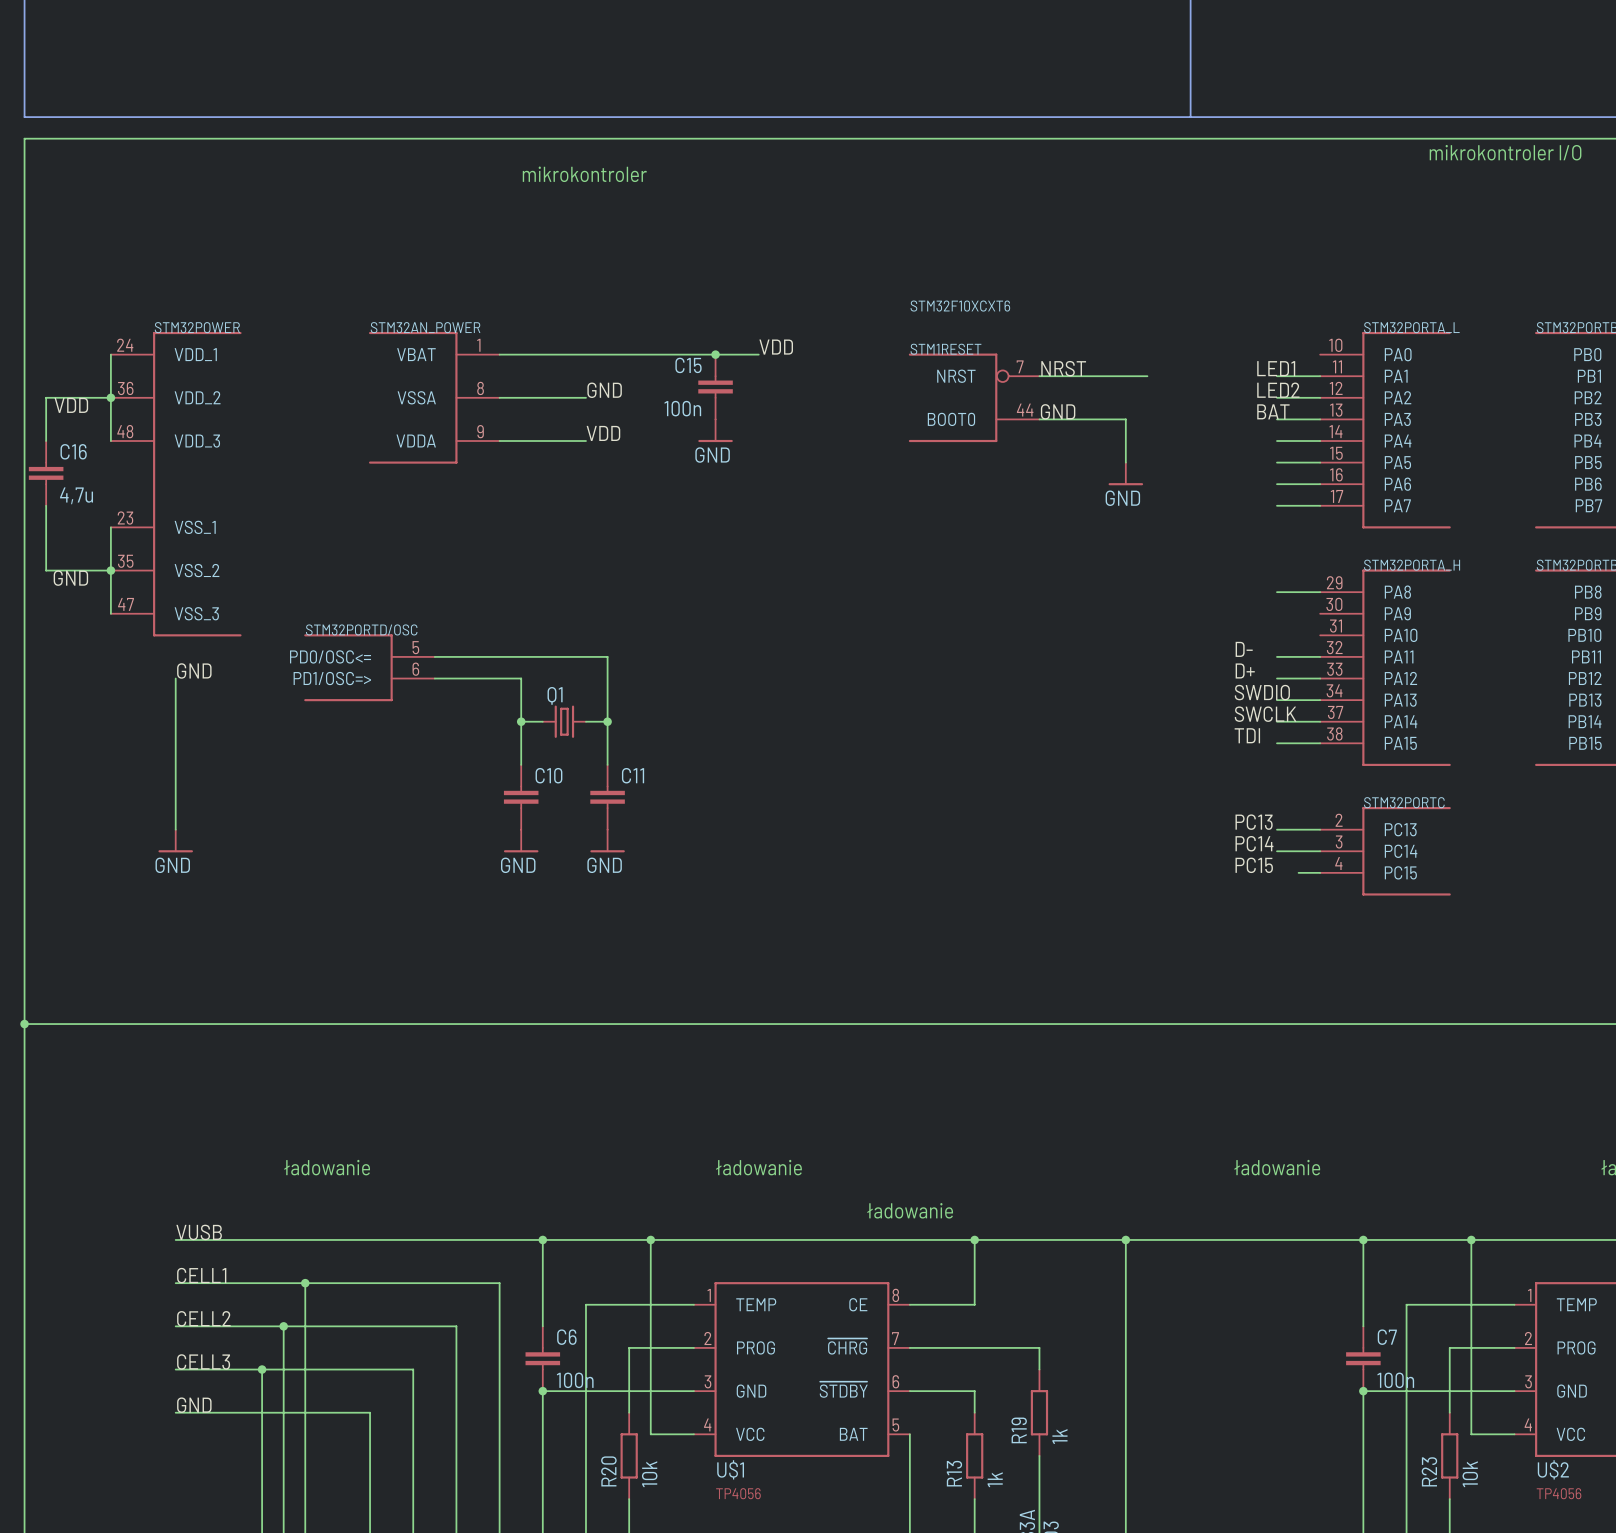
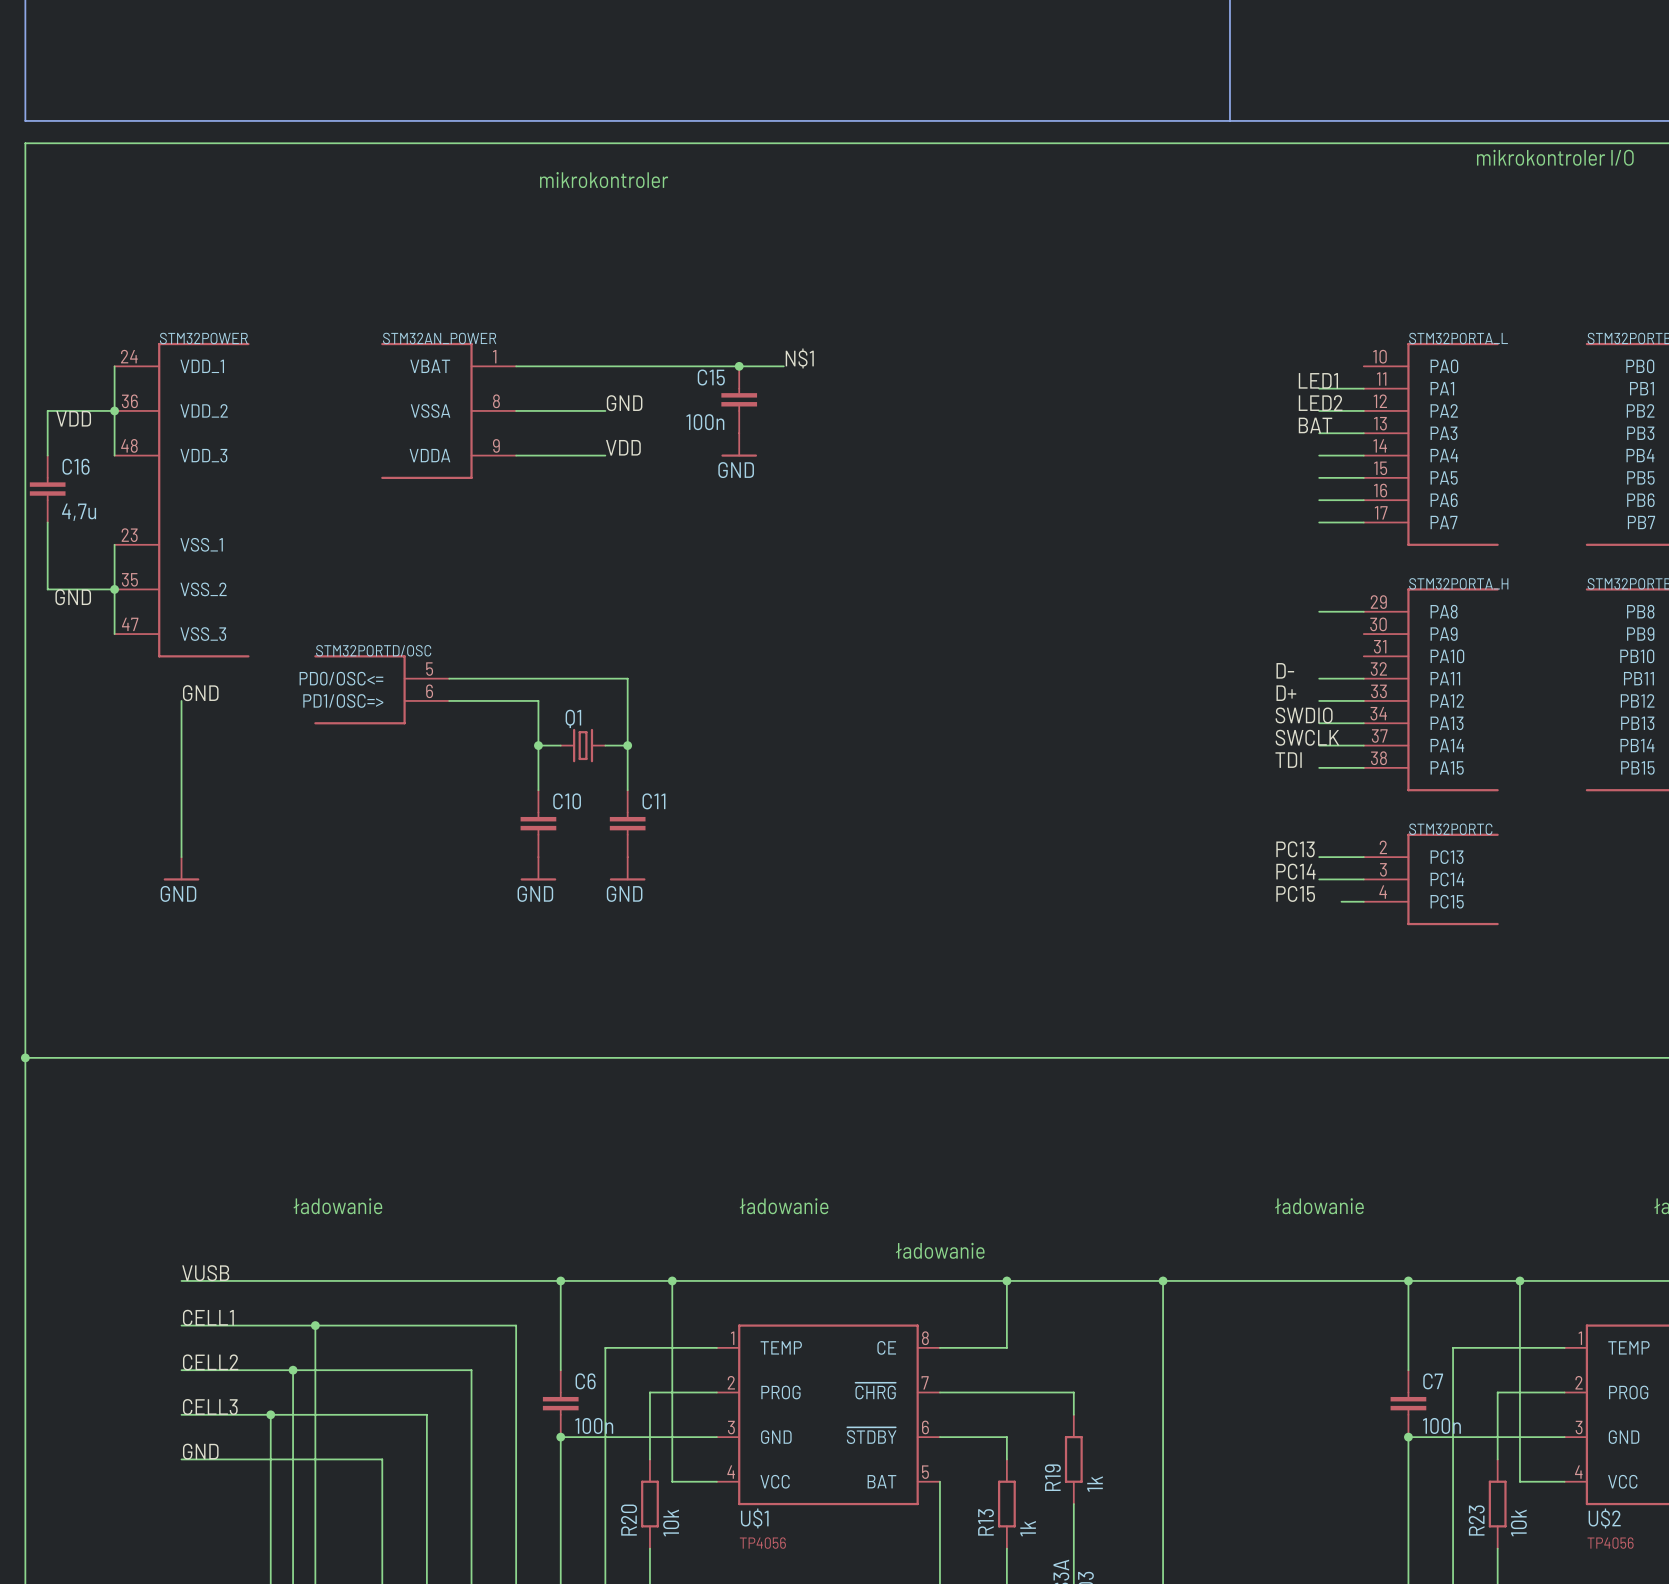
label: VDD (776, 347) -> N$1 (799, 358)
label: NRST (1063, 368) -> none
wire: (1039, 376) (1147, 376) -> none
STM1RESET: STM32F10XCXT6 (974, 397) -> none
label: GND (1058, 411) -> none
wire: (1039, 419) (1125, 419) (1125, 462) -> none
power symbol: GND (1125, 473) -> none

